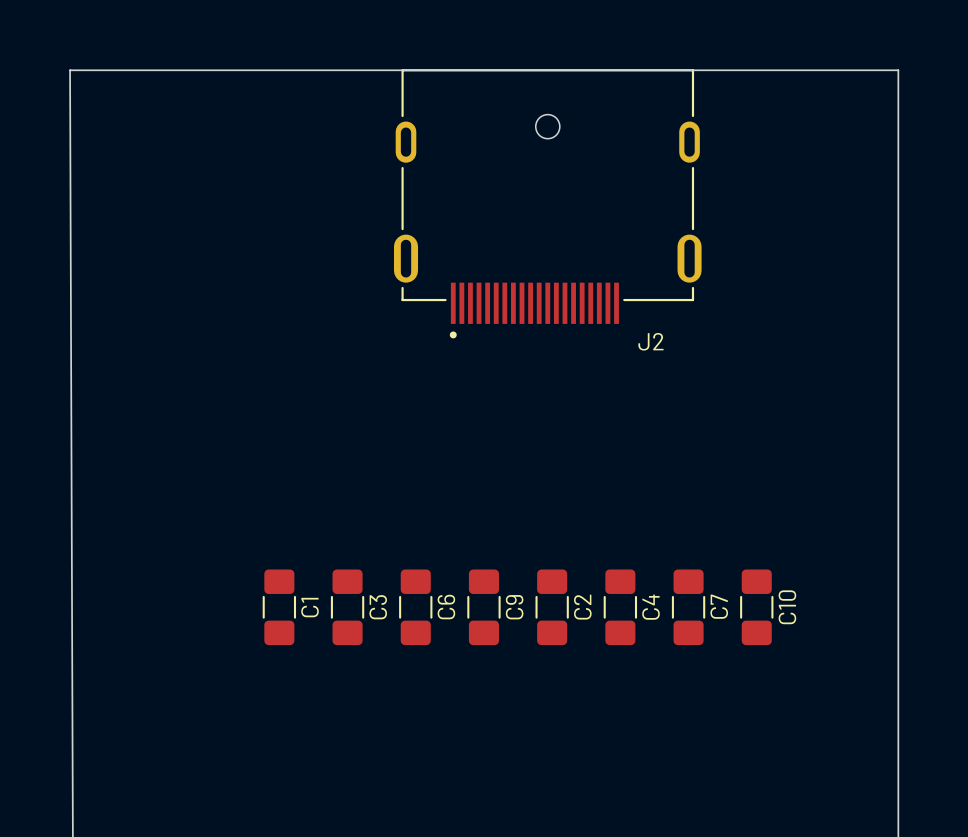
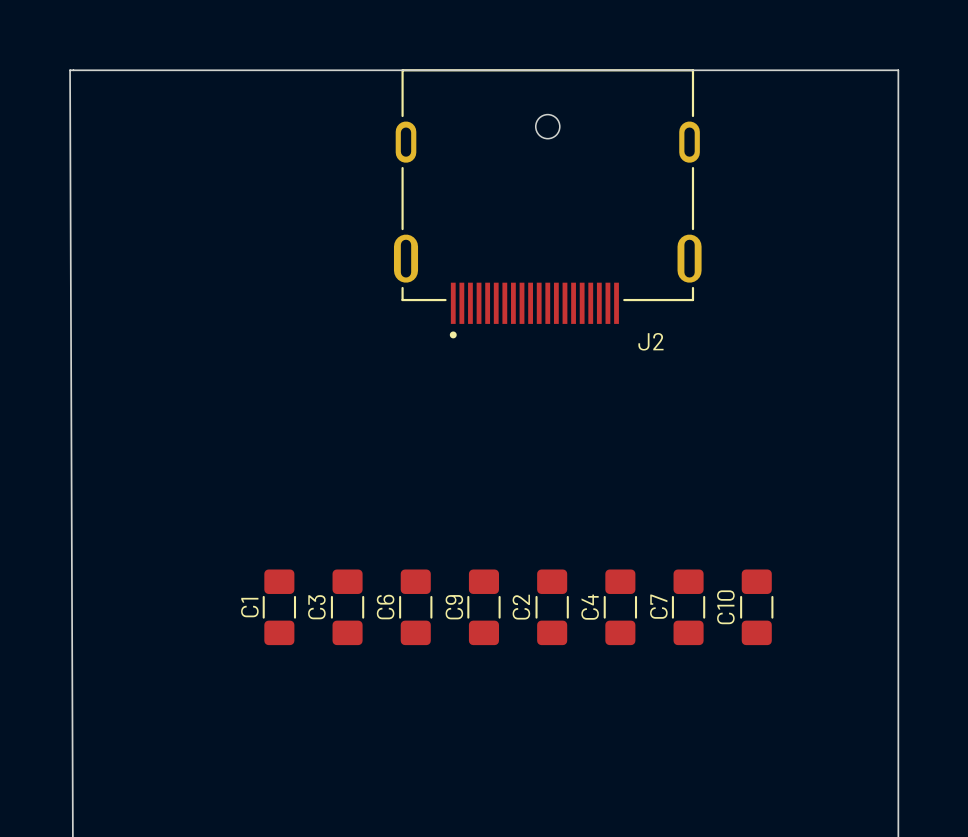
C7 name position: C7 (719, 606) -> C7 (658, 606)
C1 name position: C1 (310, 607) -> C1 (249, 607)
C3 name position: C3 (378, 607) -> C3 (316, 607)
C6 name position: C6 (446, 607) -> C6 (385, 607)
C9 name position: C9 (514, 607) -> C9 (454, 607)
C2 name position: C2 (582, 607) -> C2 (521, 607)
C4 name position: C4 (651, 607) -> C4 (590, 607)
C10 name position: C10 (787, 607) -> C10 (725, 607)

